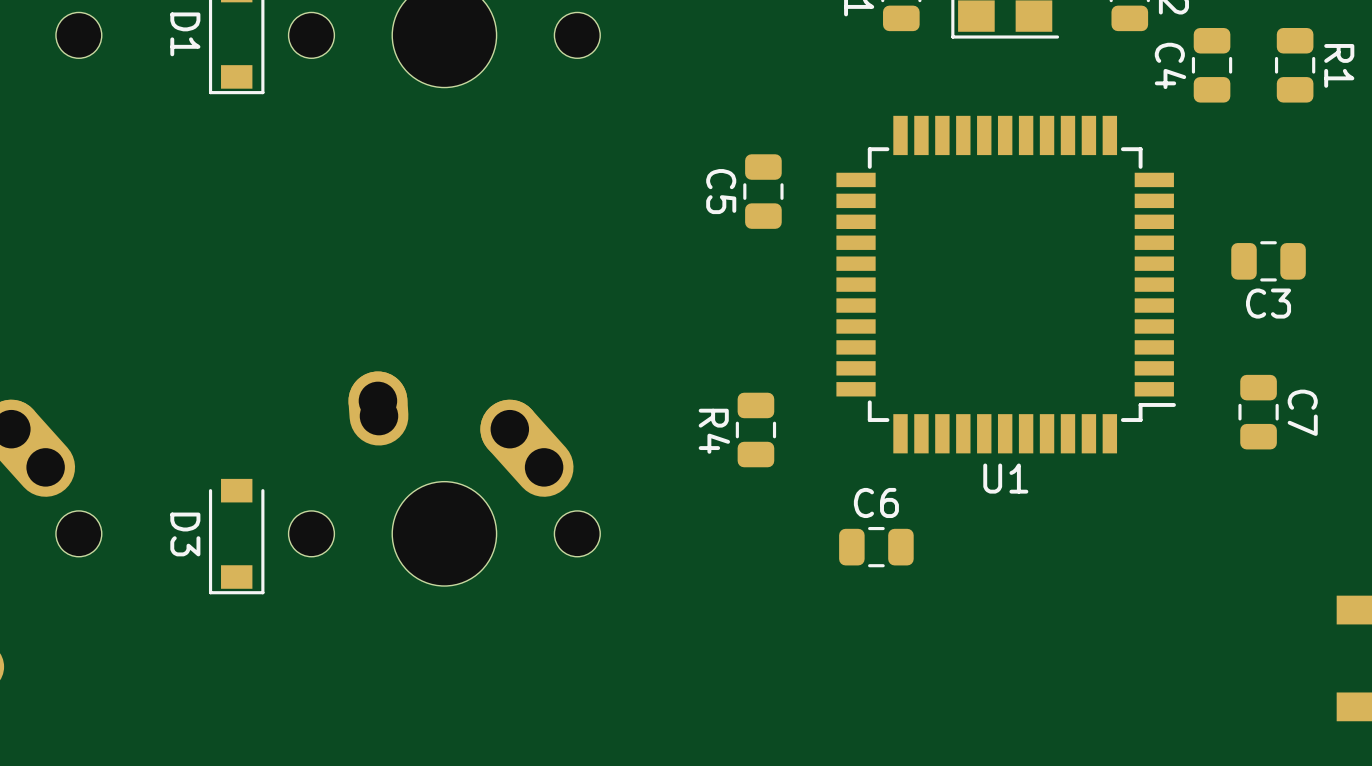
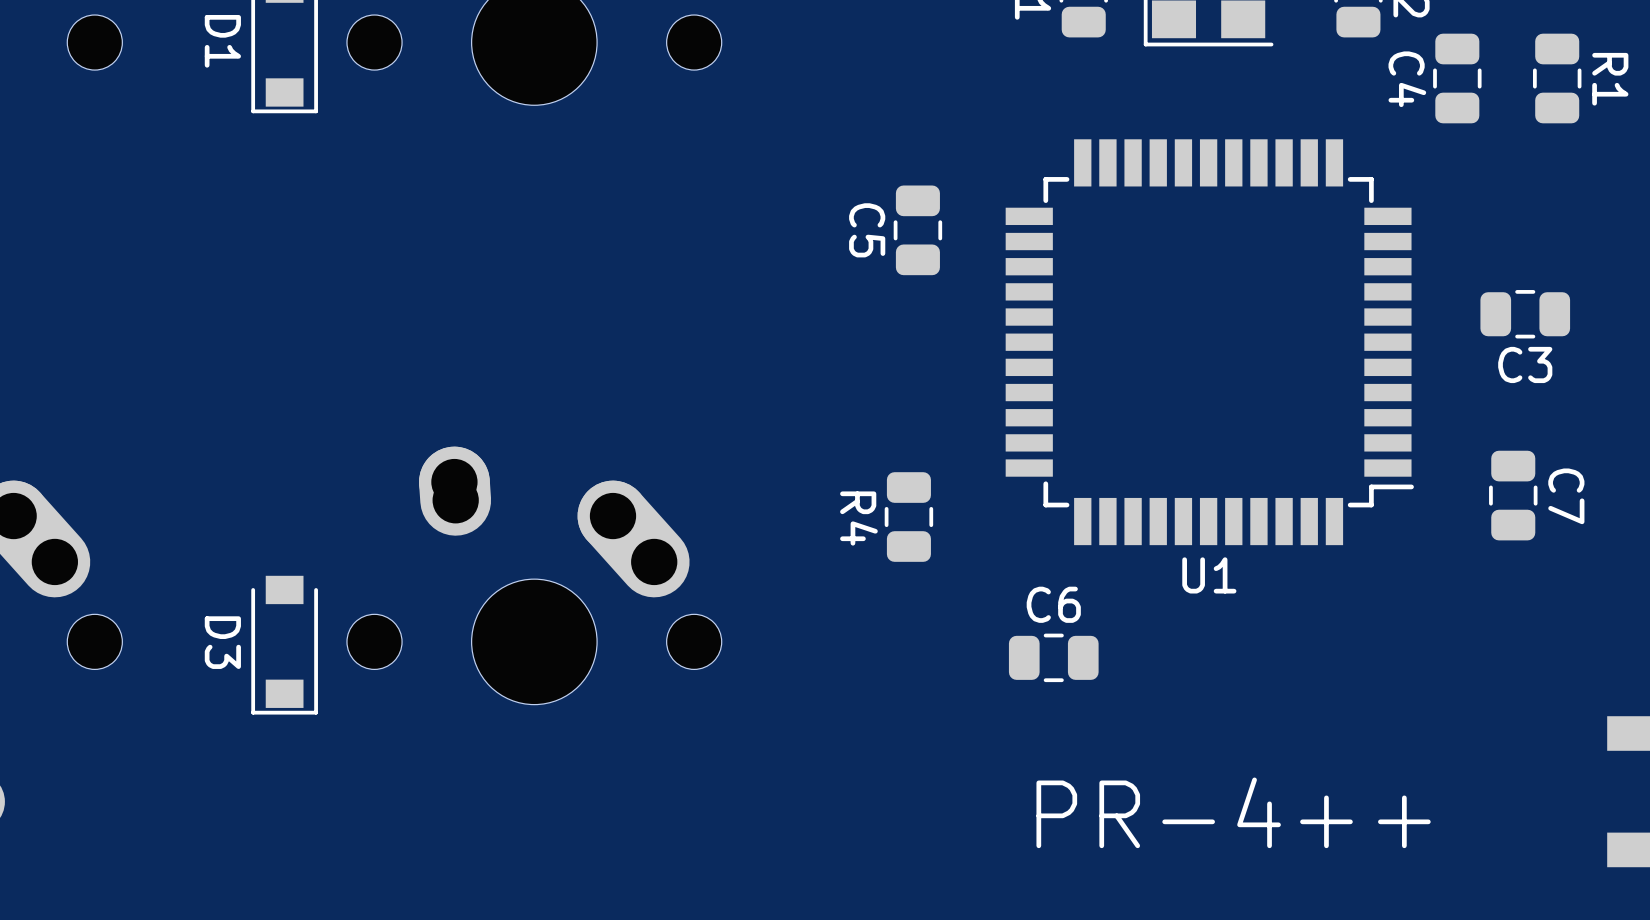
text: none -> PR-4++ (1233, 812)

